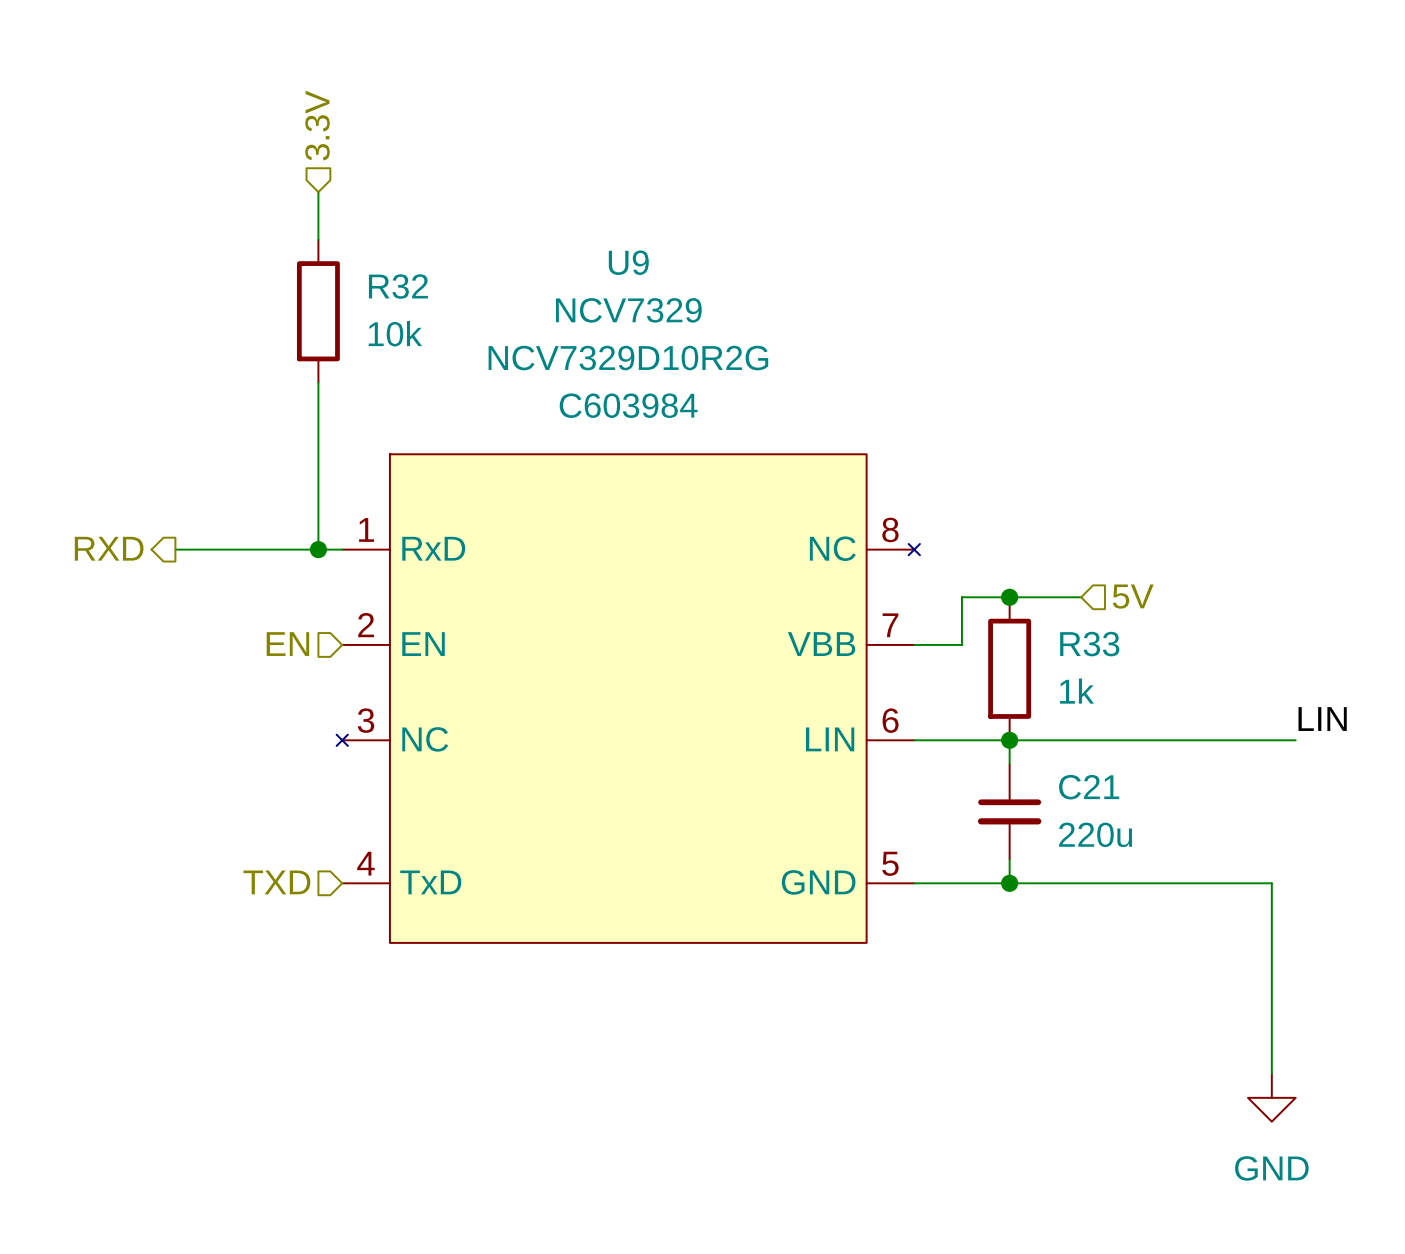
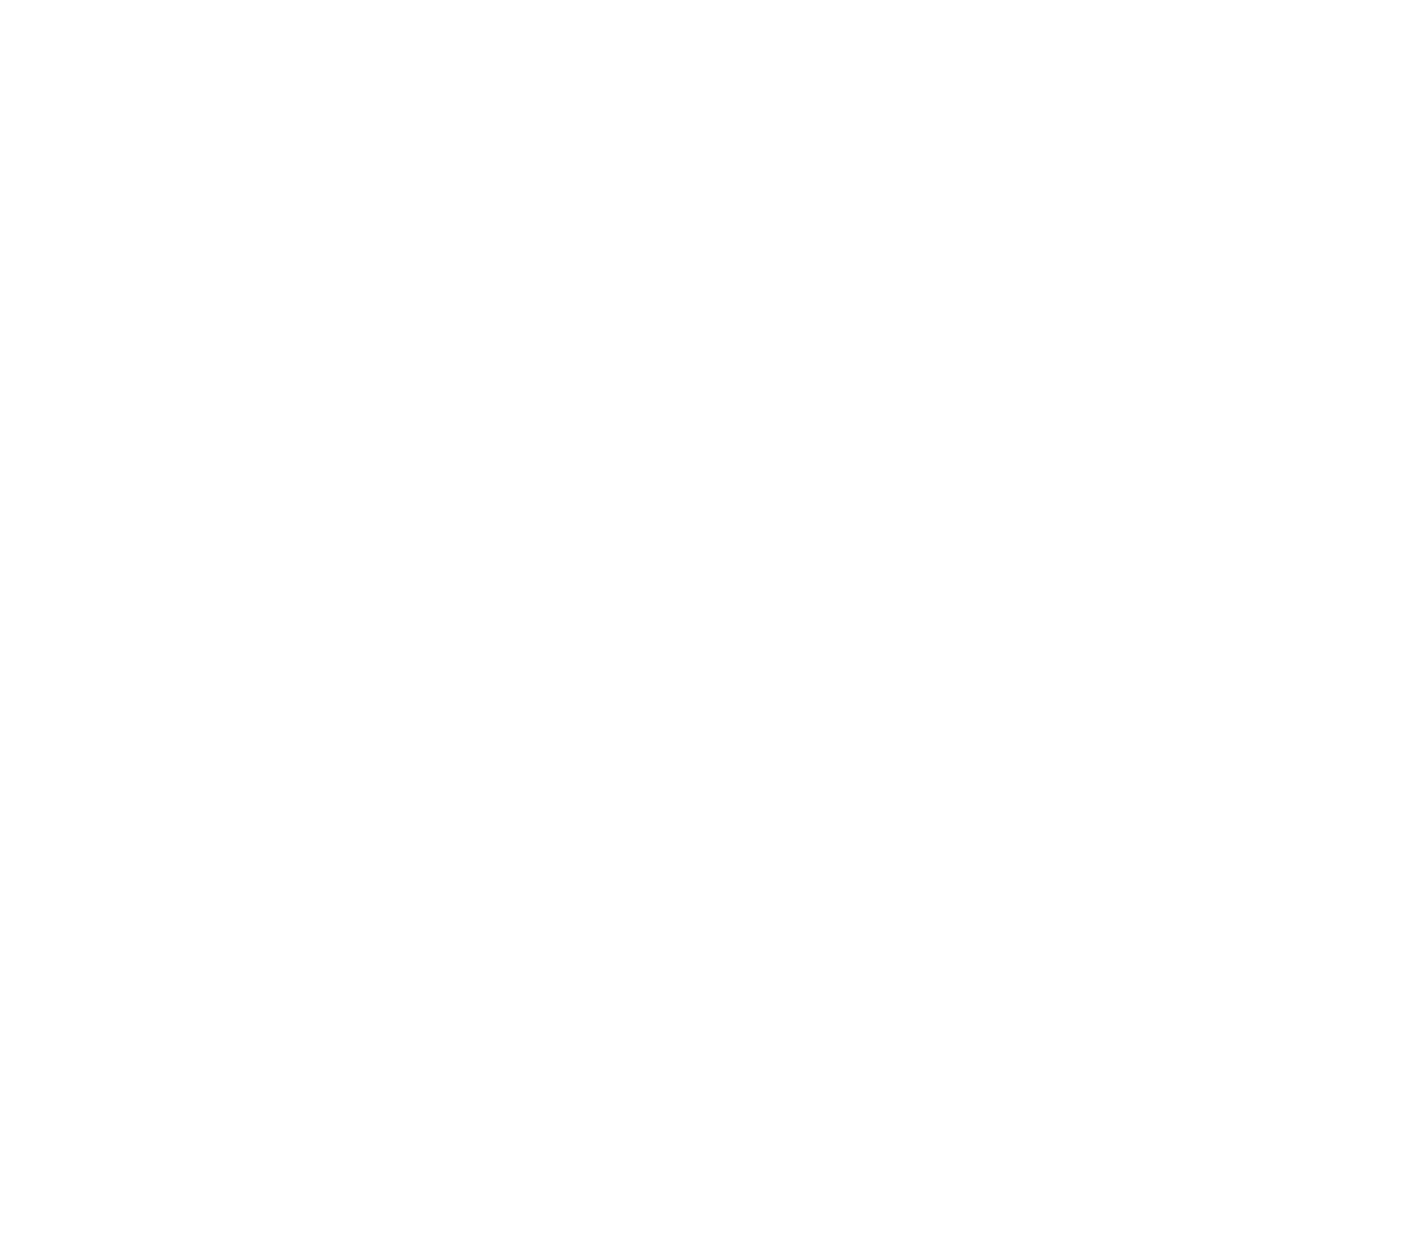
hierarchical label: 3.3V (317, 125) -> none
wire: (318, 192) (318, 239) -> none
R32: 10k (318, 311) -> none
wire: (318, 382) (318, 549) -> none
hierarchical label: RXD (109, 548) -> none
wire: (175, 549) (342, 549) -> none
junction: (318, 549) -> none
hierarchical label: 5V (1133, 596) -> none
junction: (1009, 597) -> none
wire: (1081, 597) (961, 597) (961, 644) (914, 644) -> none
hierarchical label: EN (287, 644) -> none
R33: 1k (1009, 668) -> none
U9: NCV7329 (628, 698) -> none
label: LIN (1322, 719) -> none
wire: (914, 740) (1295, 740) -> none
wire: (1009, 740) (1009, 764) -> none
junction: (1009, 740) -> none
C21: 220u (1009, 811) -> none
wire: (1009, 859) (1009, 883) -> none
hierarchical label: TXD (276, 882) -> none
wire: (914, 883) (1271, 883) (1271, 1073) -> none
junction: (1009, 883) -> none
power symbol: GND (1271, 1097) -> none

